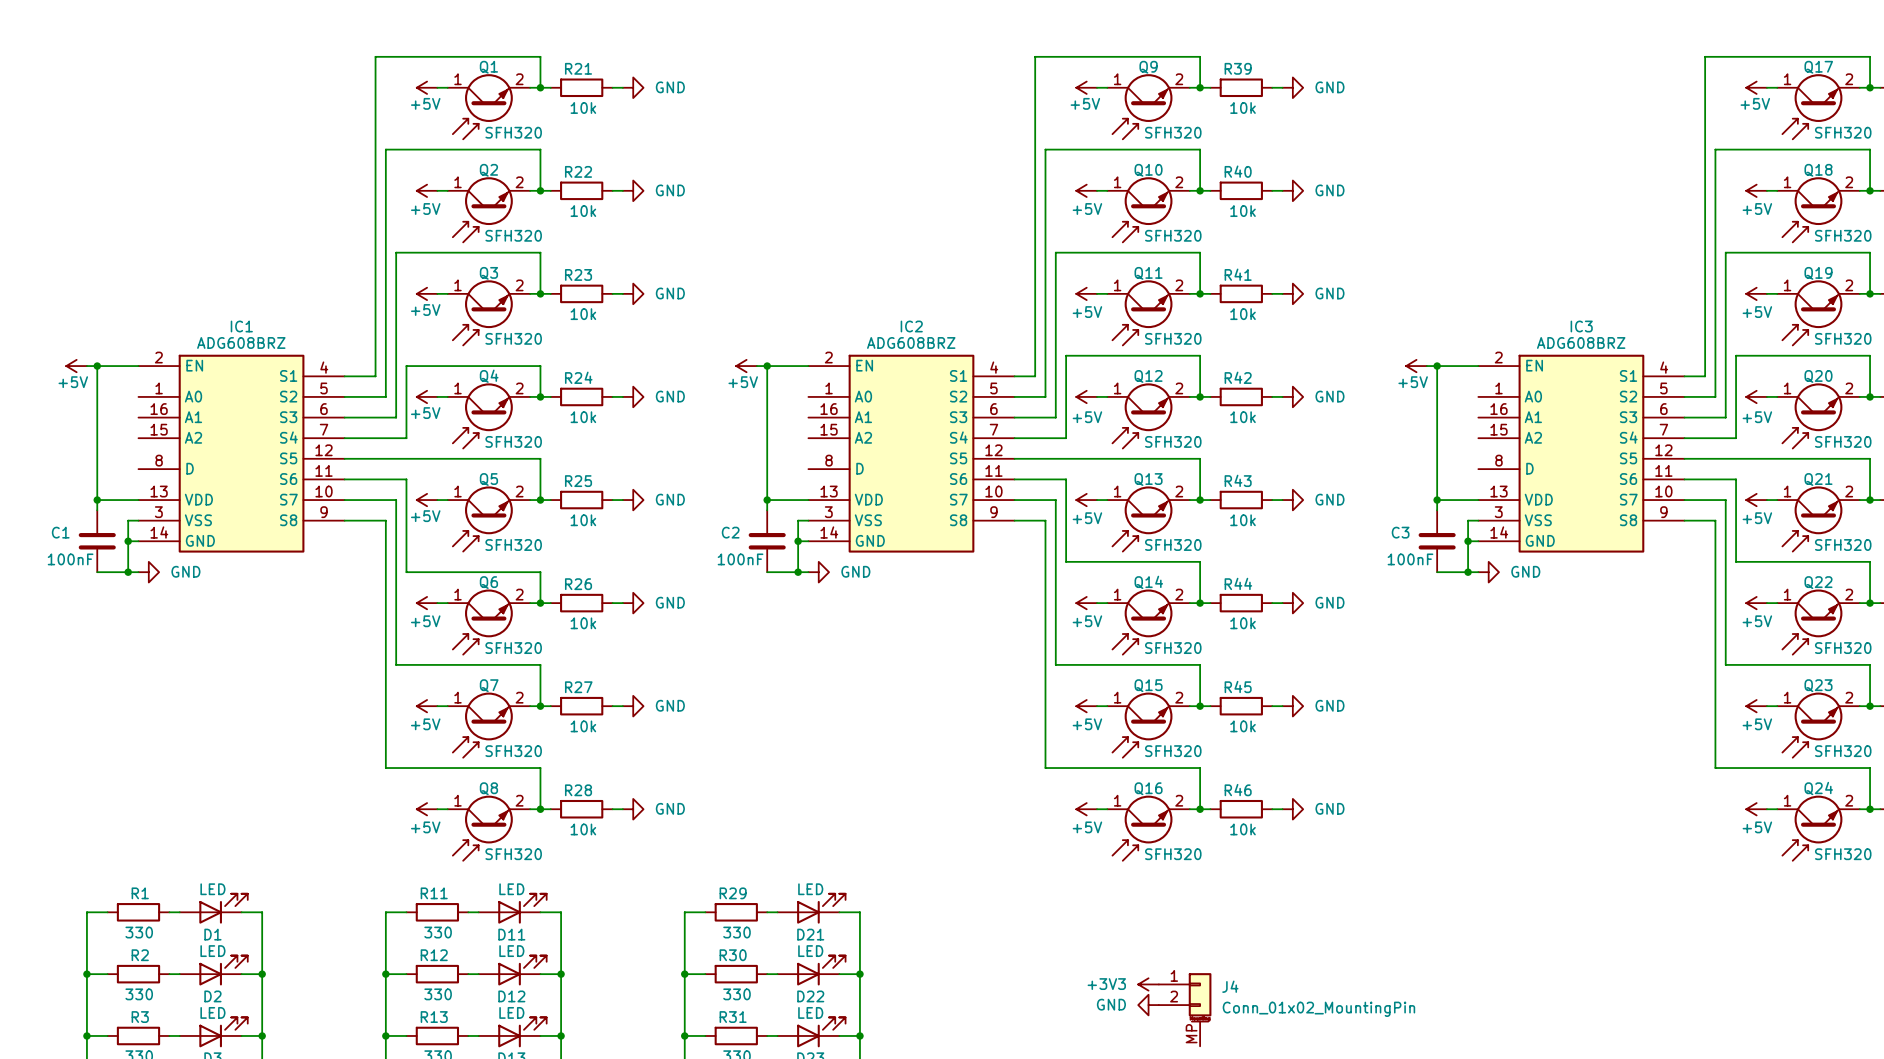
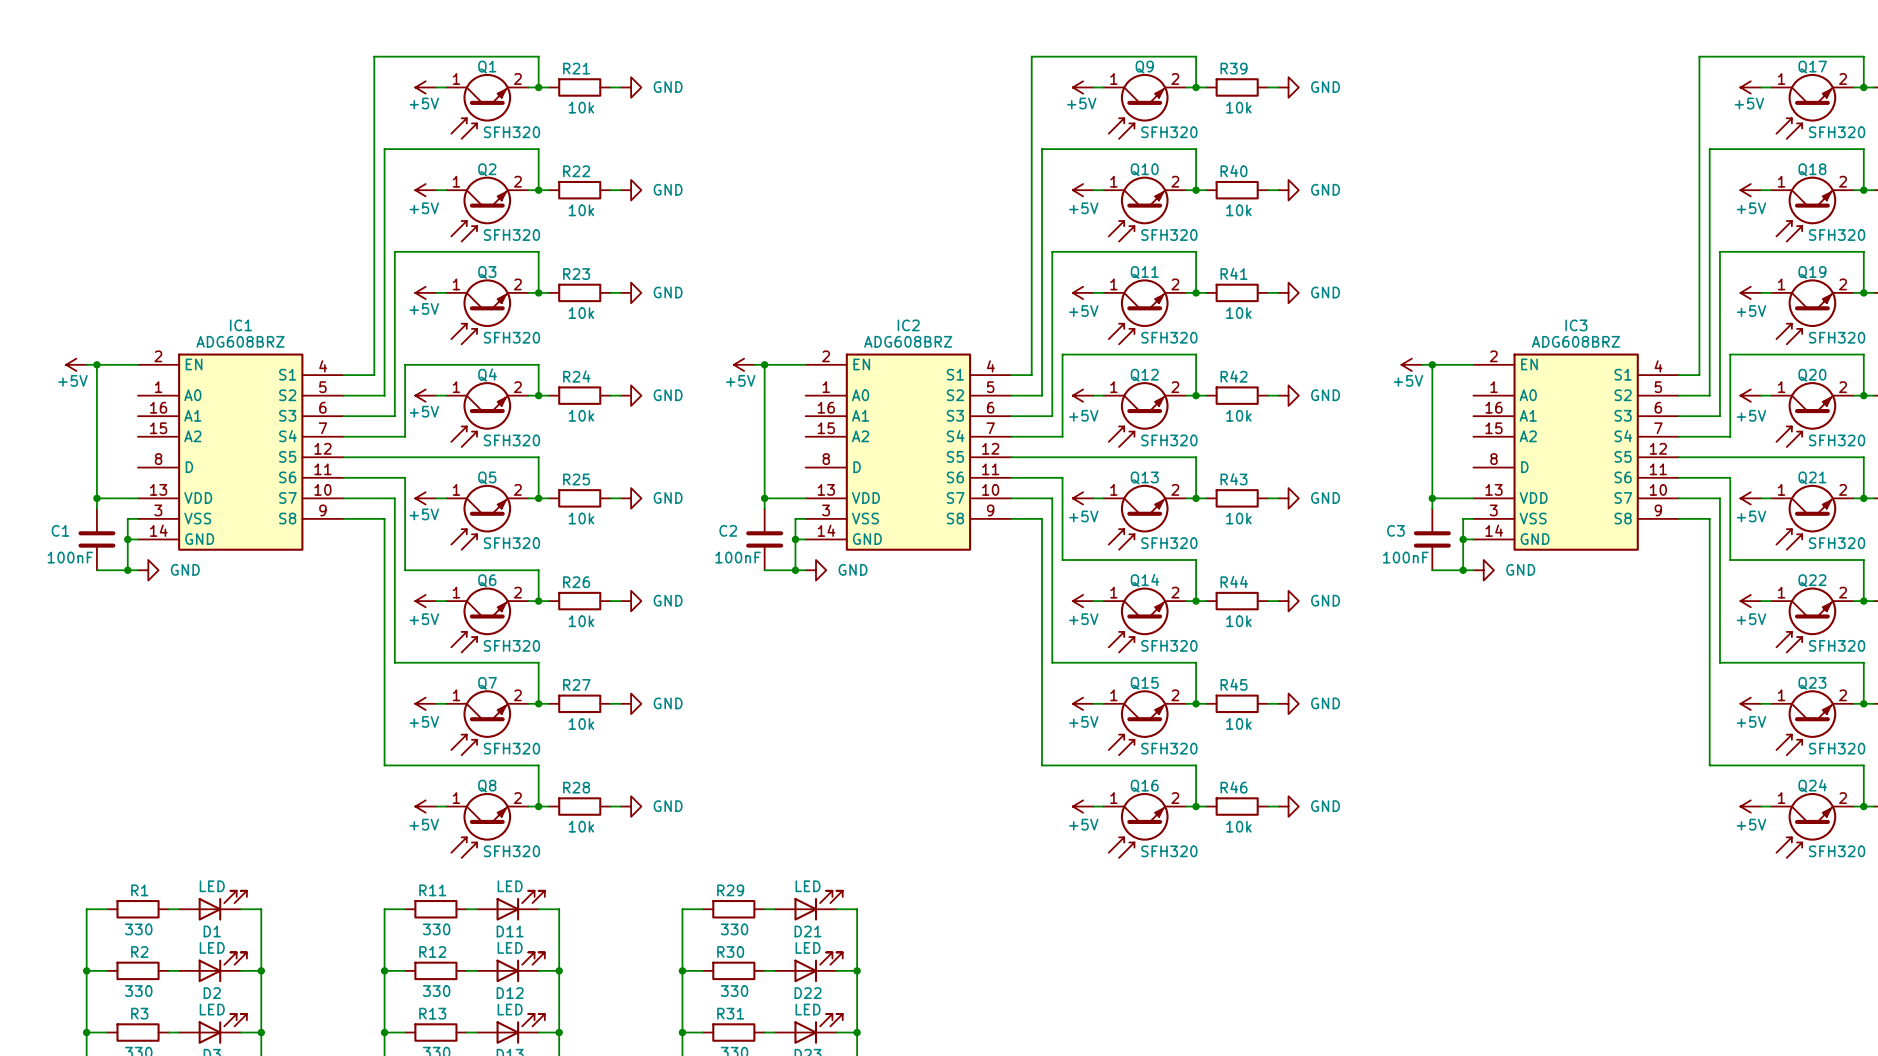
power symbol: +3V3 (1148, 984) -> none
power symbol: GND (1148, 1005) -> none
J4: Conn_01x02_MountingPin (1185, 1009) -> none

